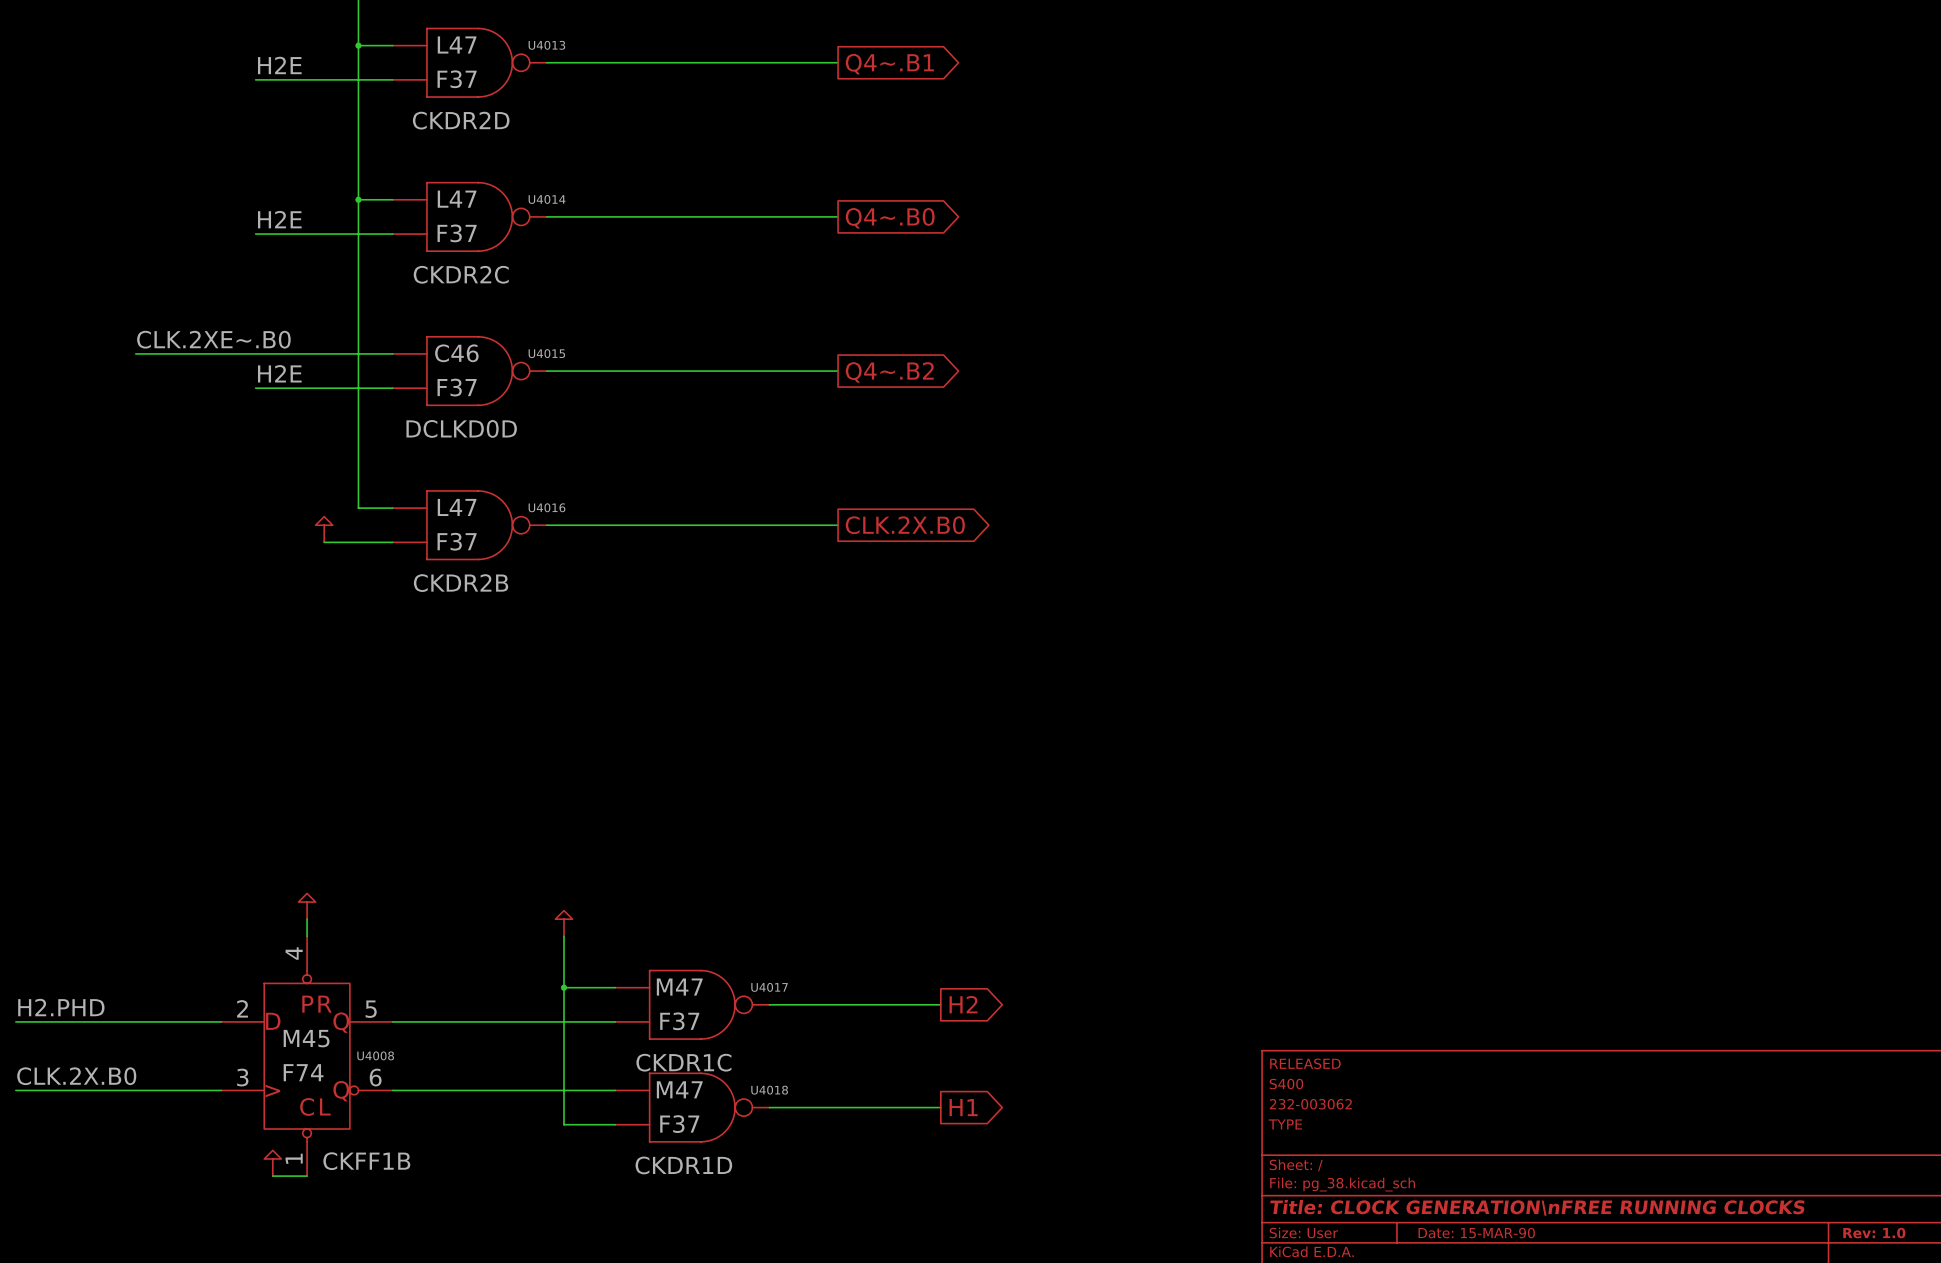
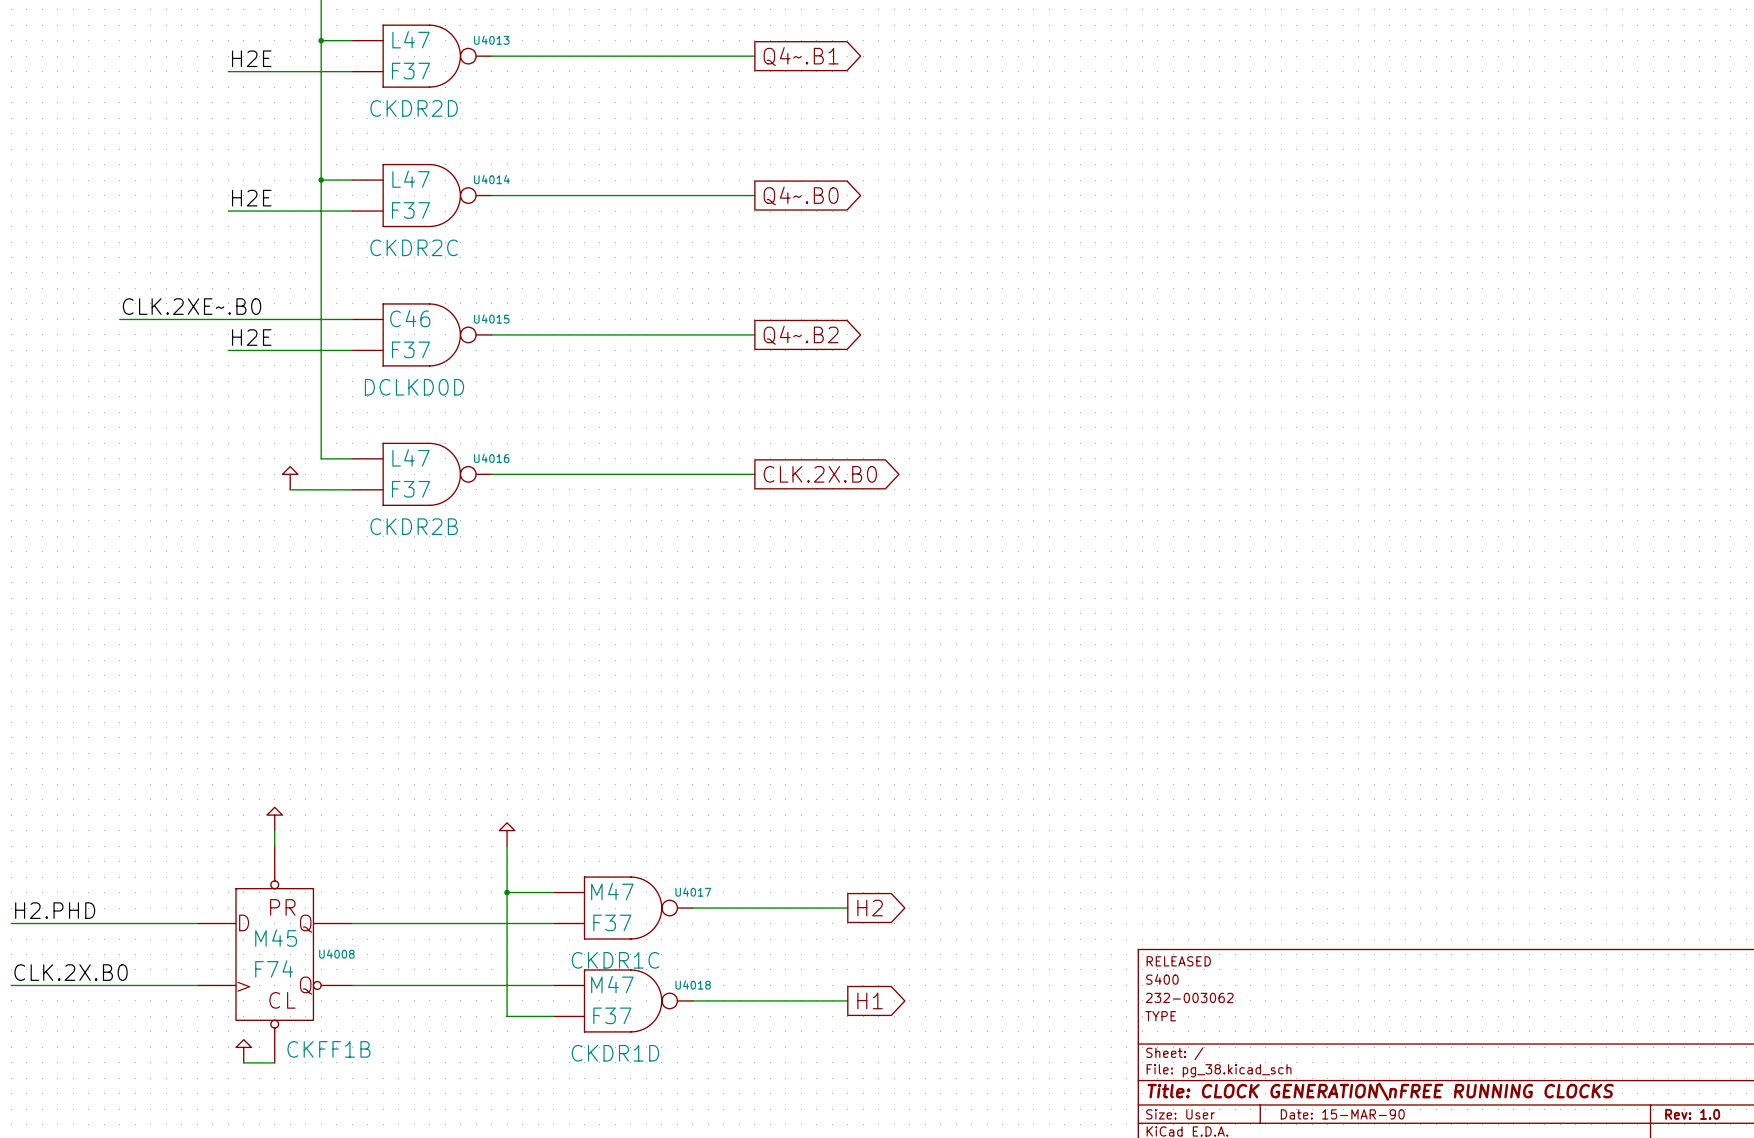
U4008 pin number: 4 (294, 953) -> none
U4008 pin number: 2 (242, 1008) -> none
U4008 pin number: 5 (371, 1009) -> none
U4008 pin number: 3 (242, 1077) -> none
U4008 pin number: 6 (375, 1077) -> none
U4008 pin number: 1 (294, 1158) -> none

